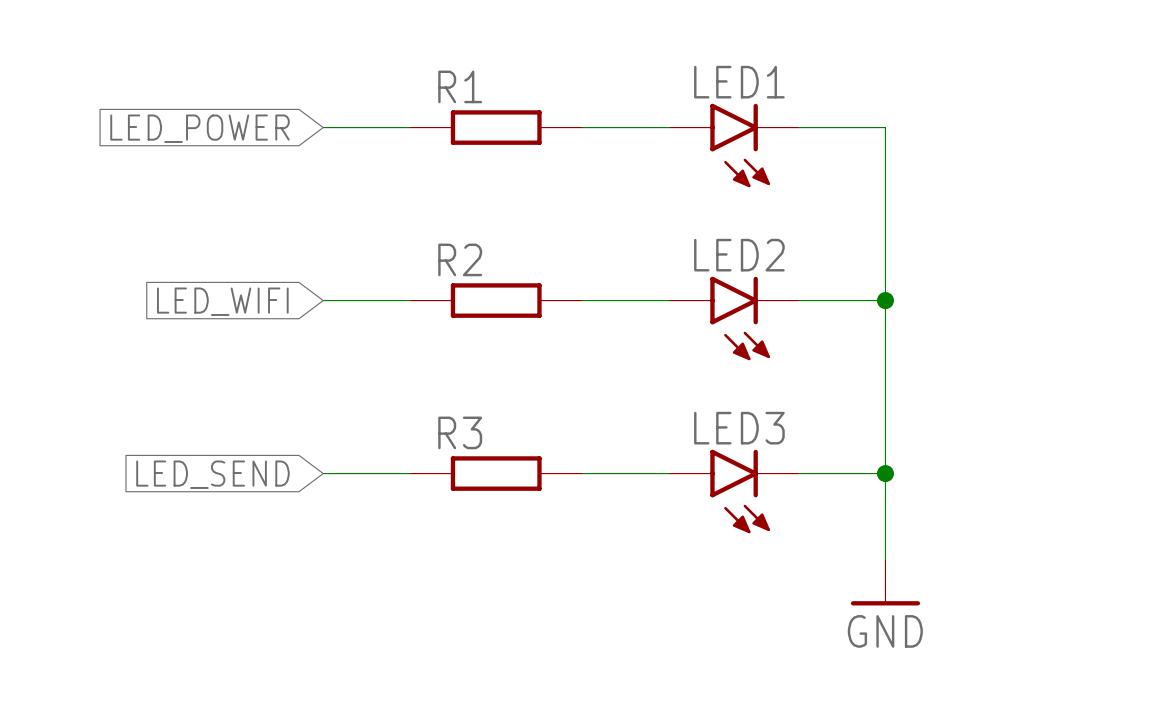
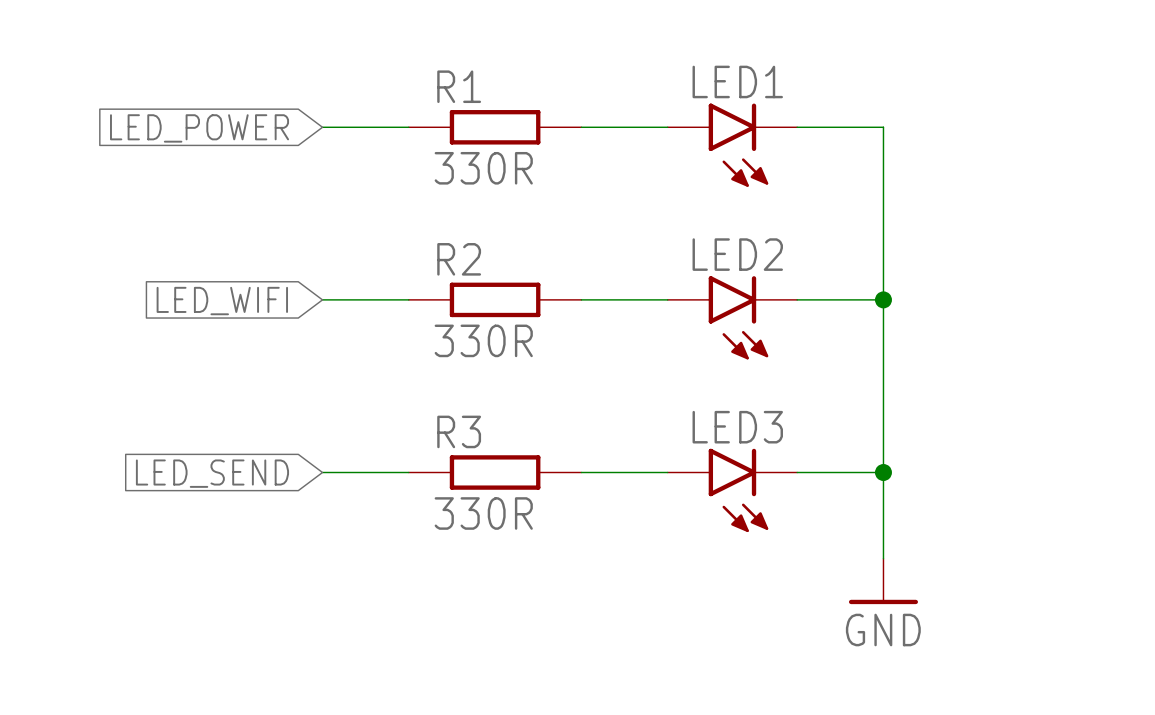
R1 value: none -> 330R (483, 168)
R2 value: none -> 330R (483, 340)
R3 value: none -> 330R (483, 513)

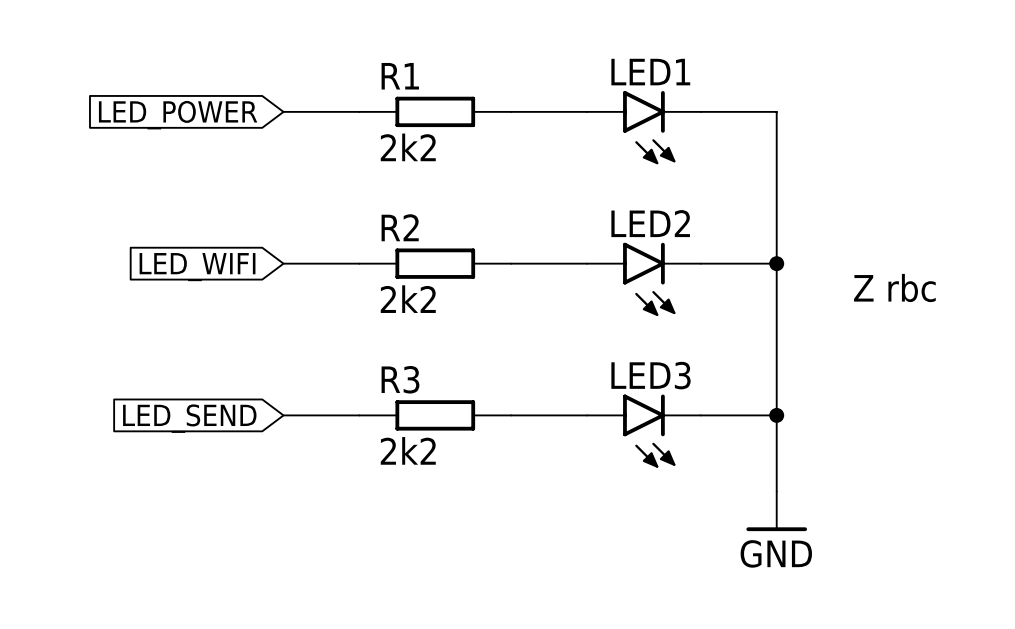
R1 value: 330R (483, 168) -> 2k2 (408, 147)
text: none -> Z rbc (894, 288)
R2 value: 330R (483, 340) -> 2k2 (408, 299)
R3 value: 330R (483, 513) -> 2k2 (408, 450)

